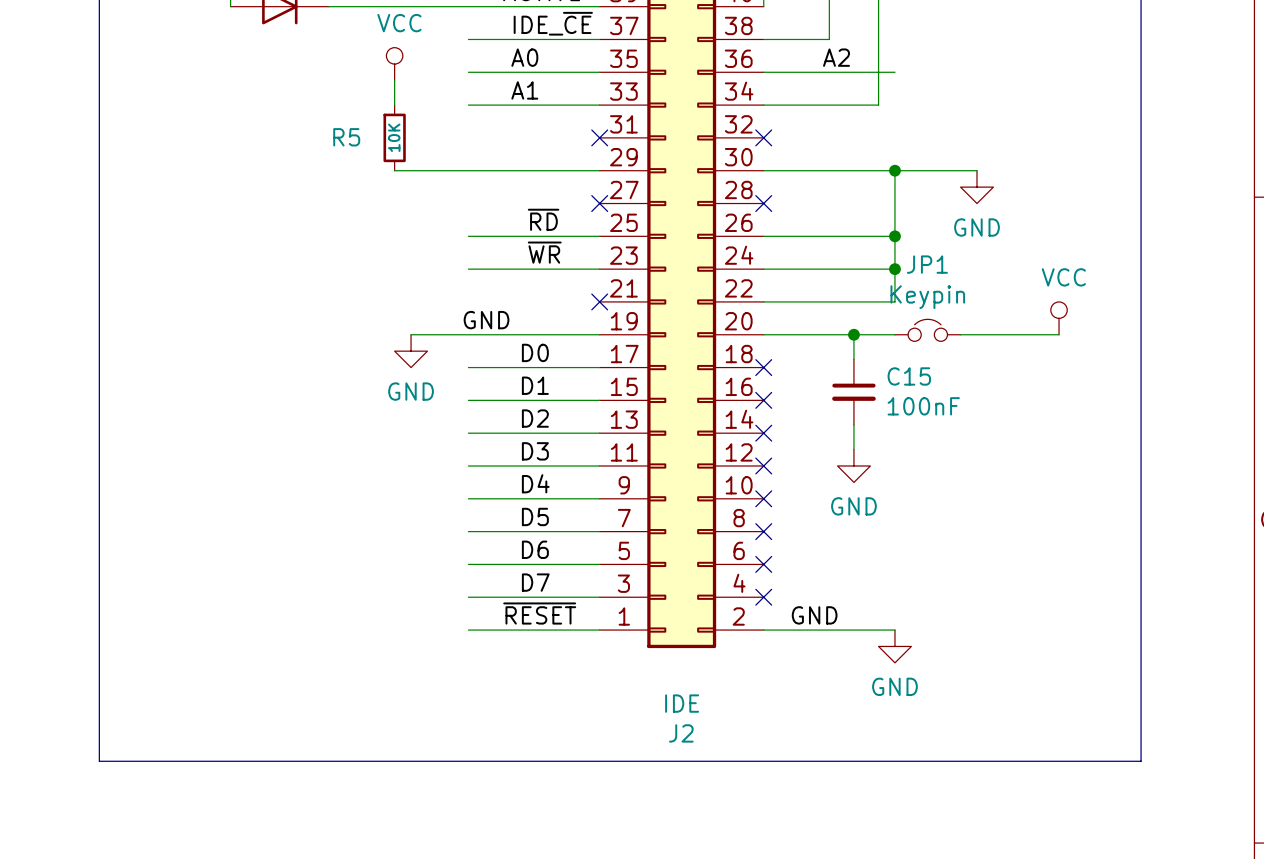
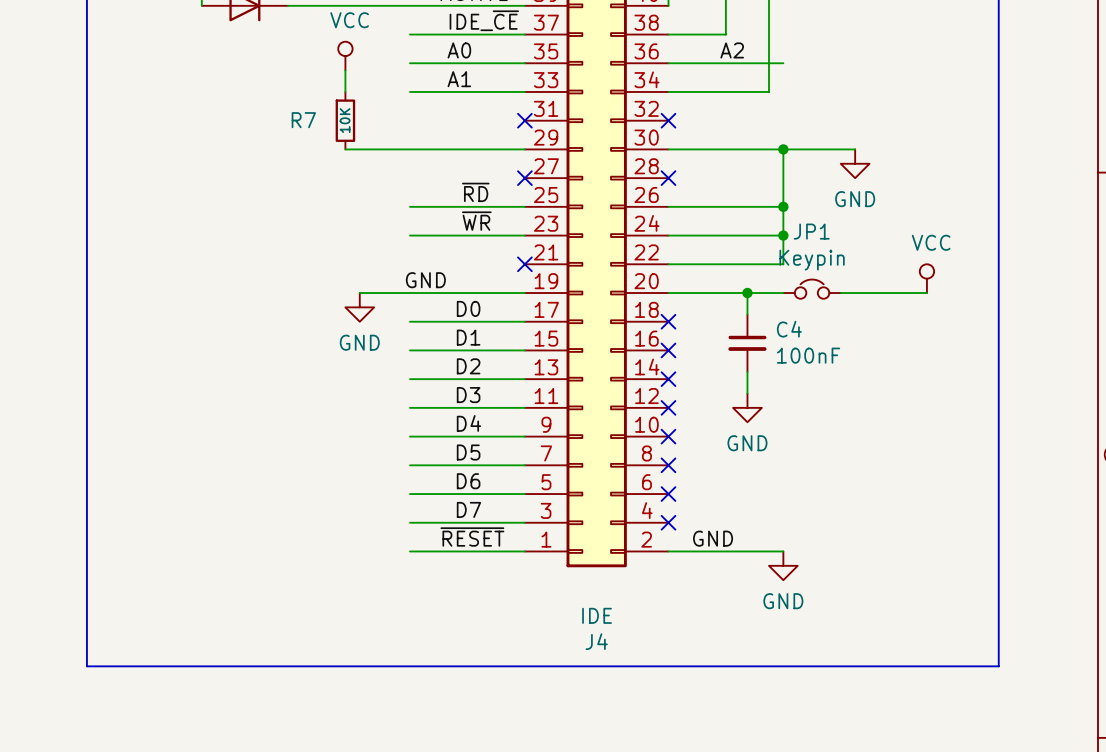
R5 name: R5 (346, 137) -> R7 (303, 120)
C15 name: C15 (909, 376) -> C4 (789, 329)
J2 name: J2 (681, 733) -> J4 (596, 641)

